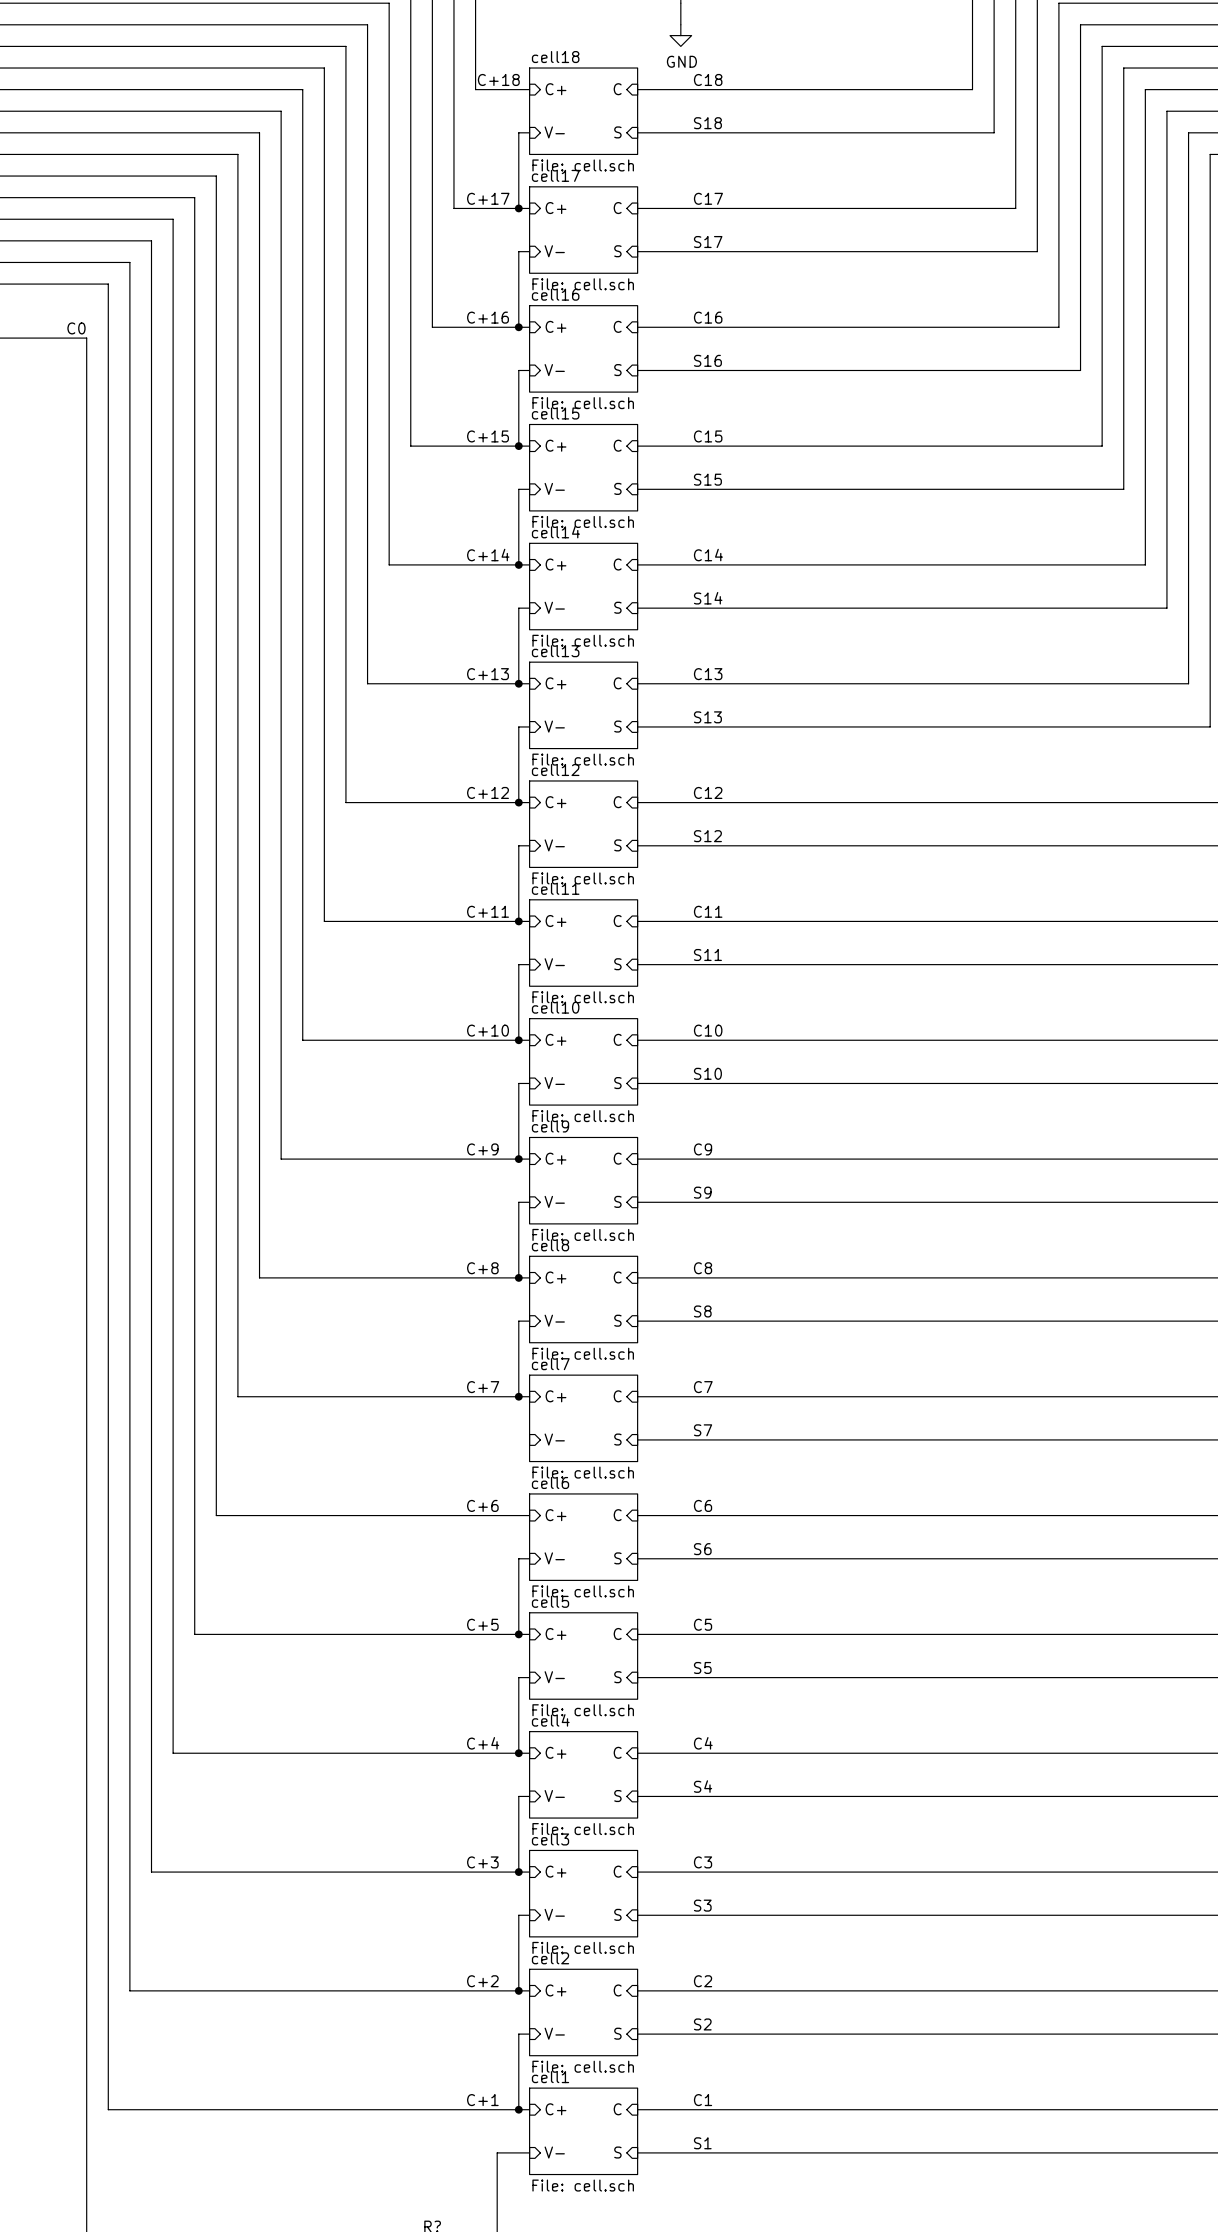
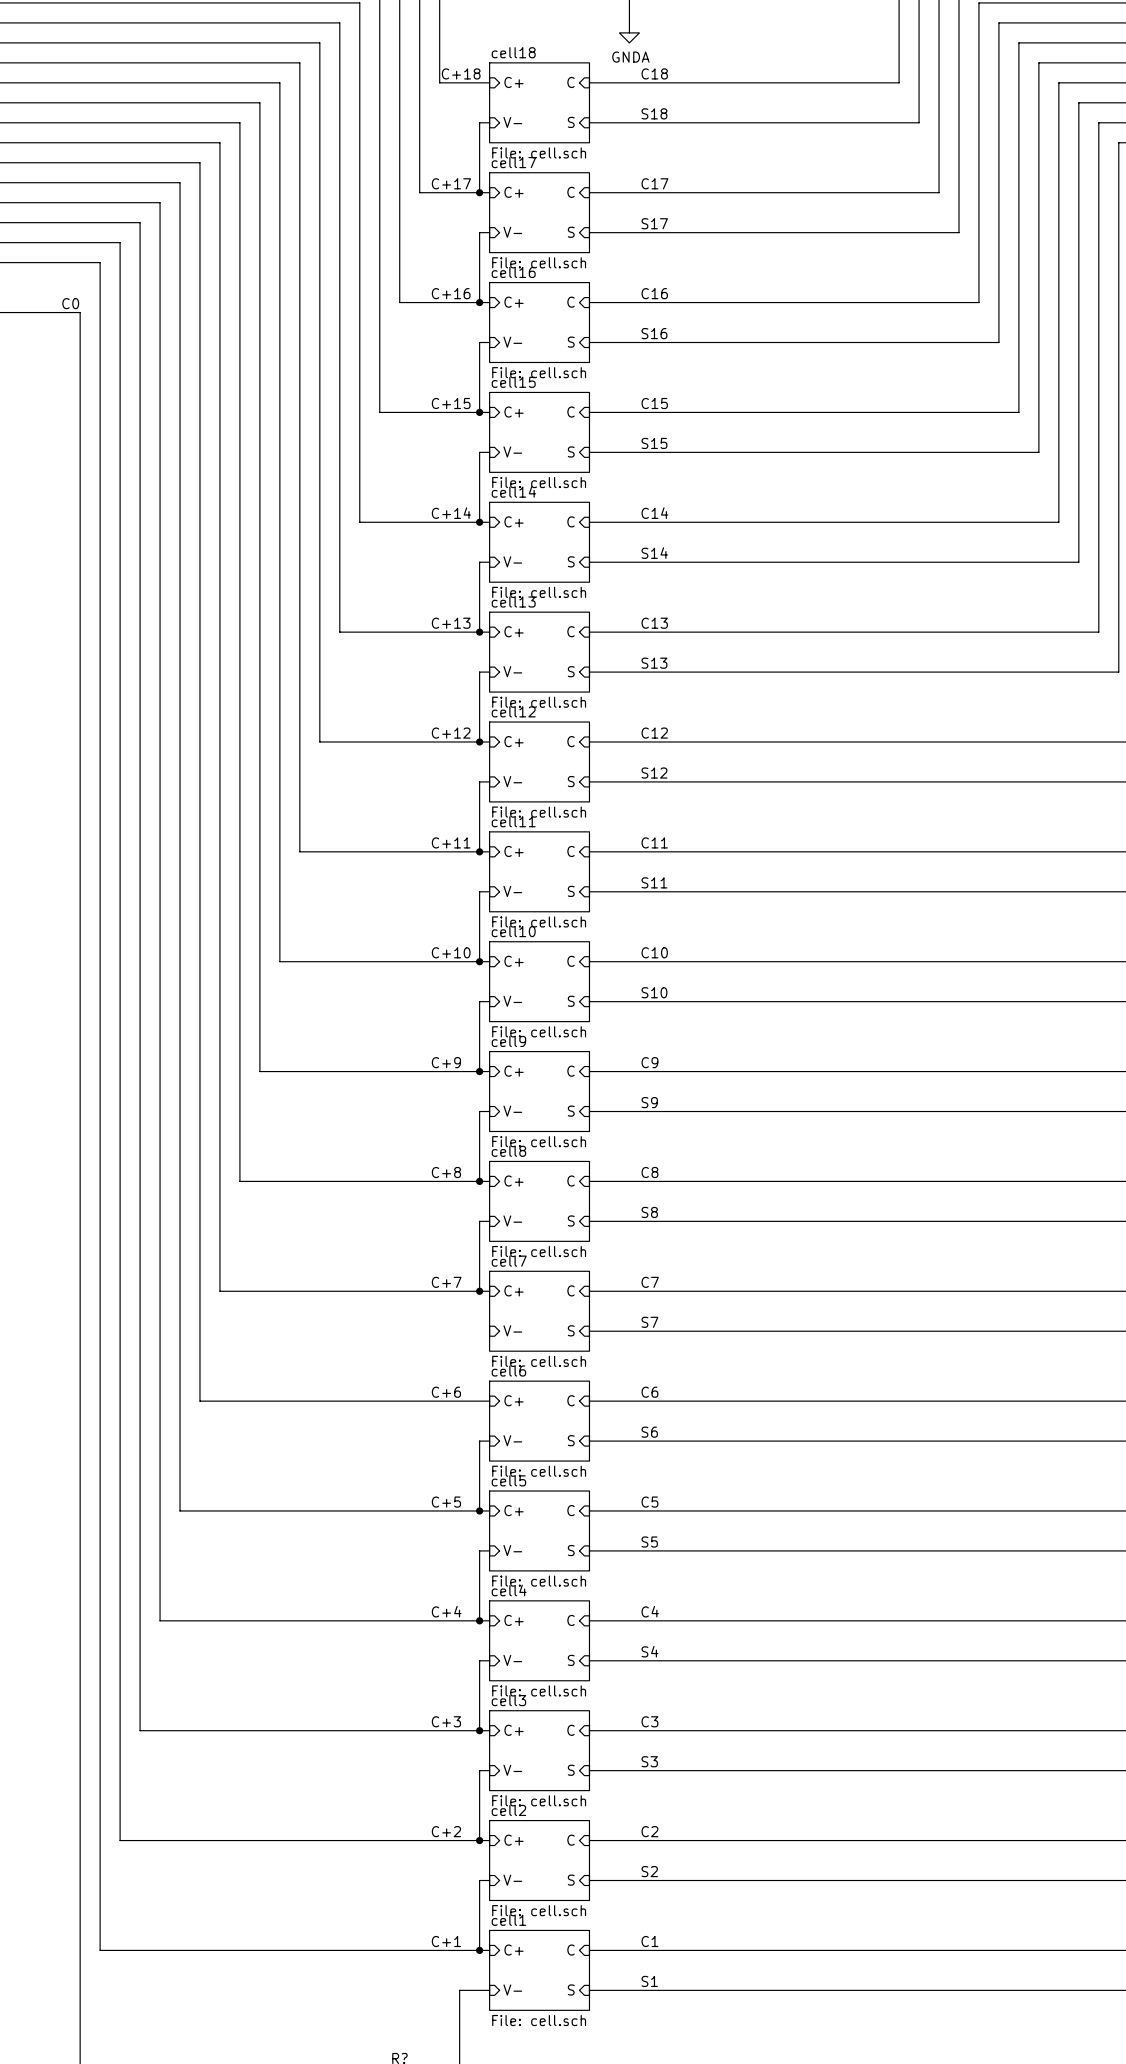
power symbol: GND (680, 35) -> GNDA (629, 32)

